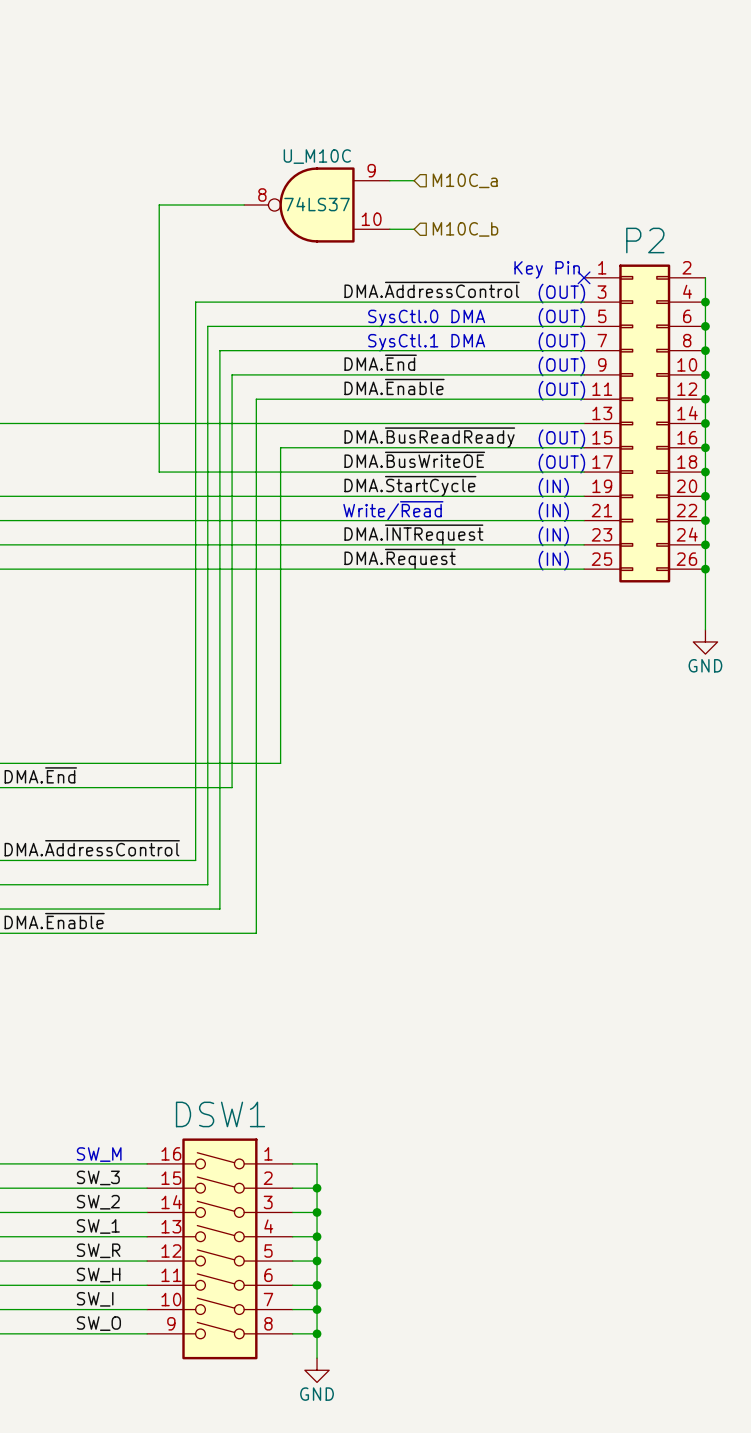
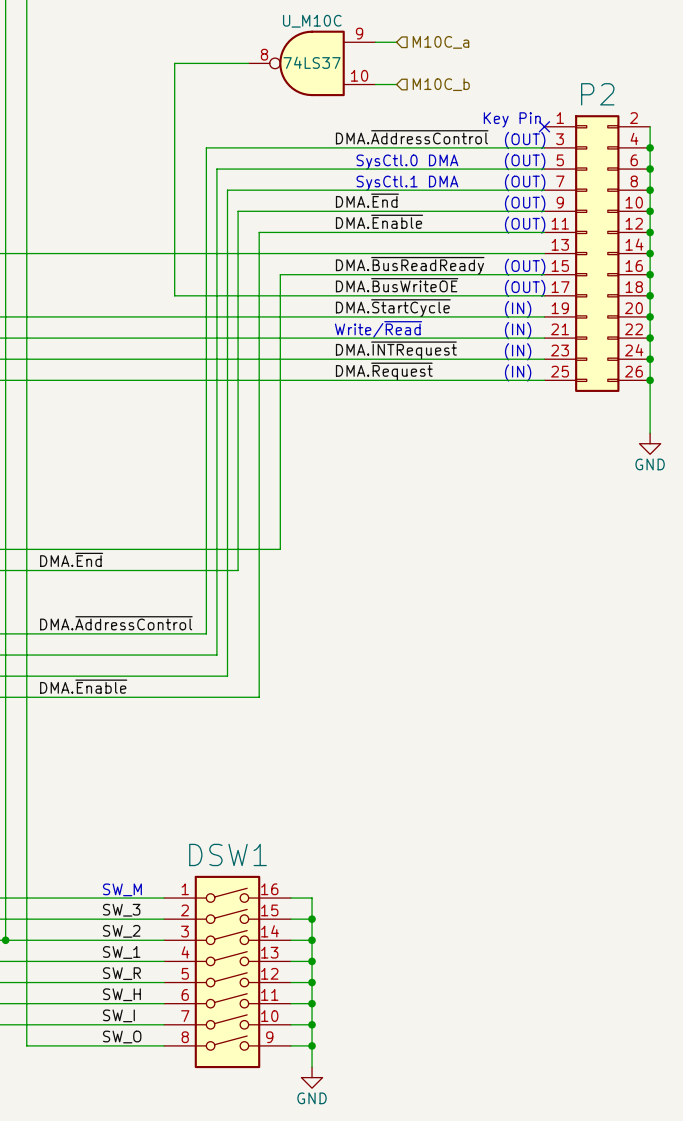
DSW1 flip: as is (219, 1248) -> left-right (227, 971)

